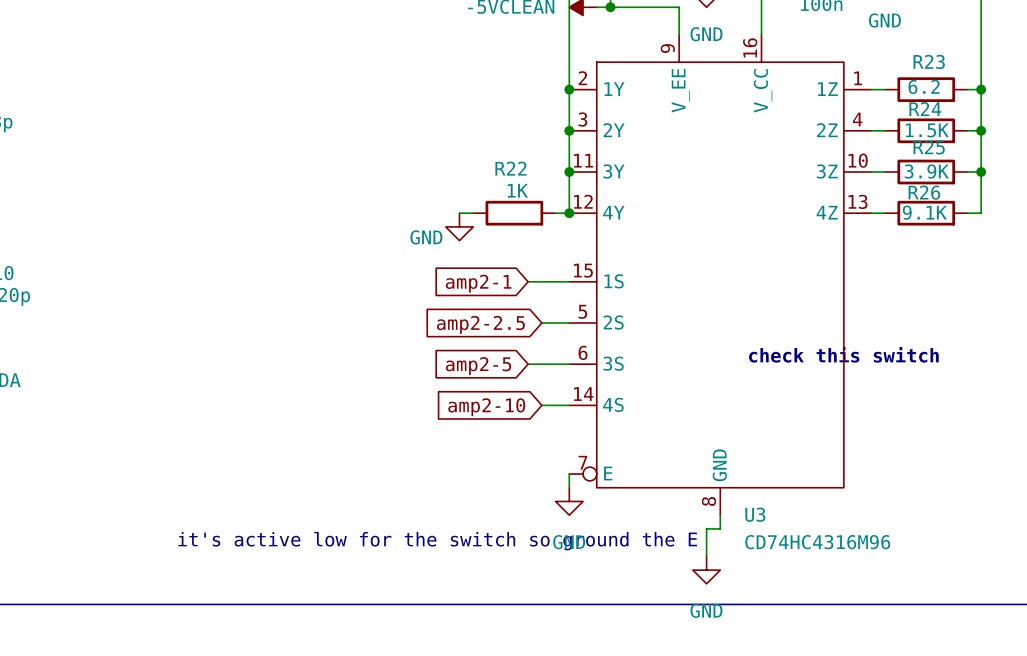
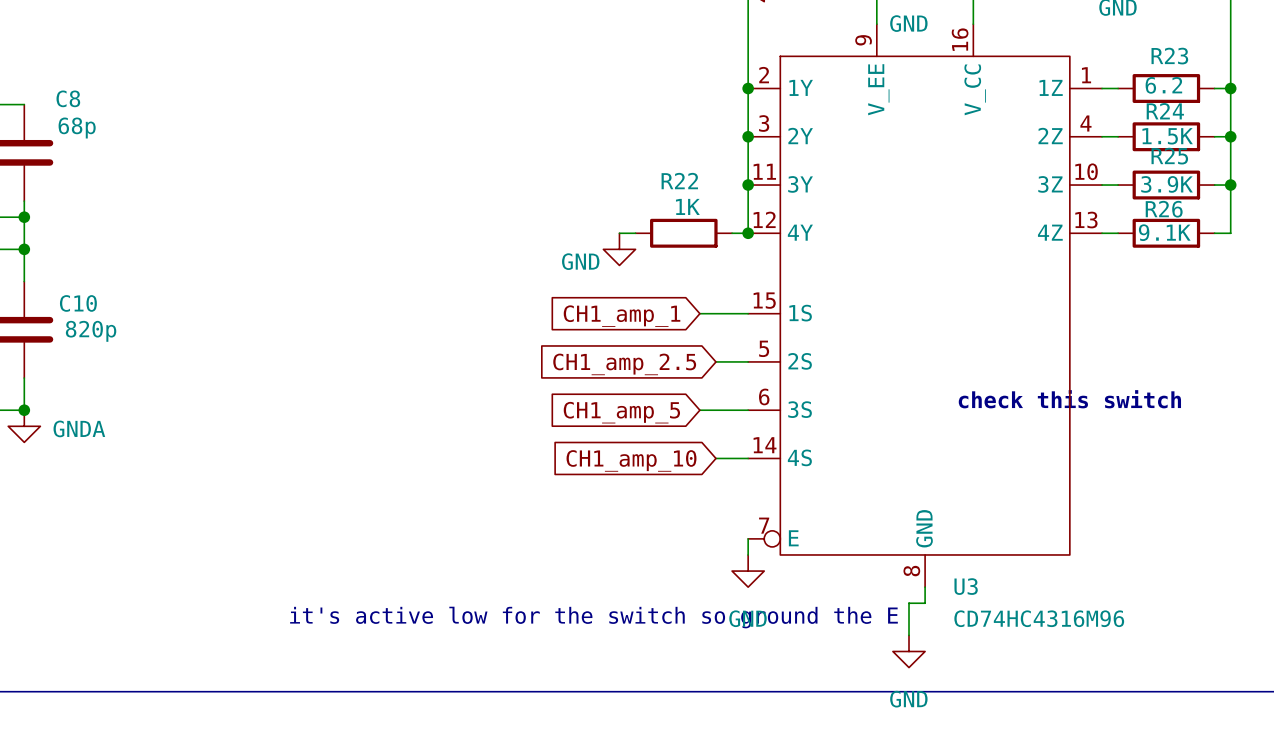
global label: amp2-1 (478, 283) -> CH1_amp_1 (622, 316)
global label: amp2-2.5 (480, 324) -> CH1_amp_2.5 (624, 364)
global label: amp2-5 (478, 366) -> CH1_amp_5 (621, 412)
global label: amp2-10 (486, 407) -> CH1_amp_10 (631, 460)

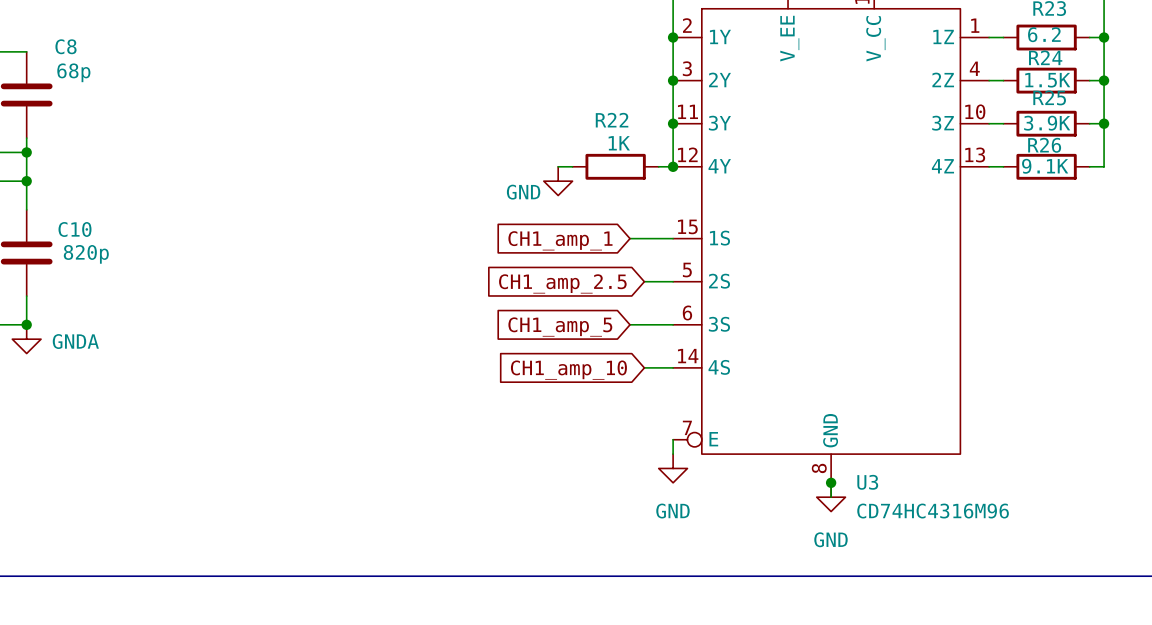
text: check this switch (1069, 399) -> none
junction: none -> (831, 482)
wire: (925, 603) (909, 603) (909, 635) -> none
text: it's active low for the switch so ground the E (593, 617) -> none
power symbol position: GND (909, 651) -> GND (831, 497)

